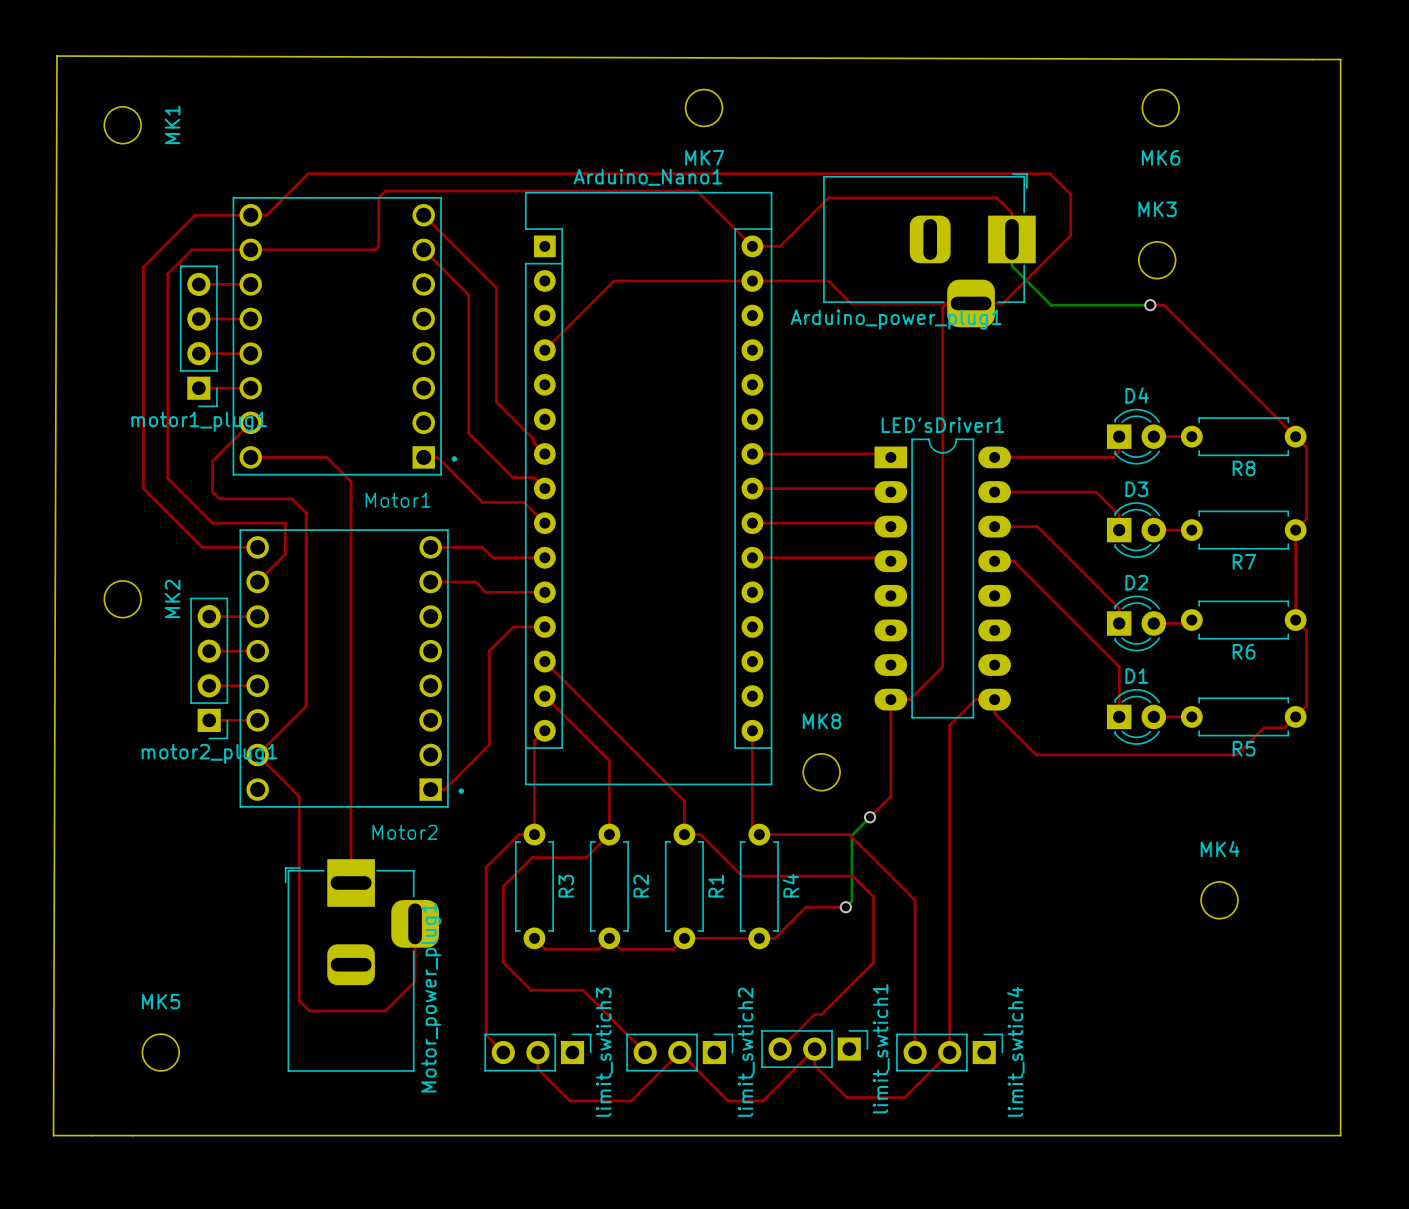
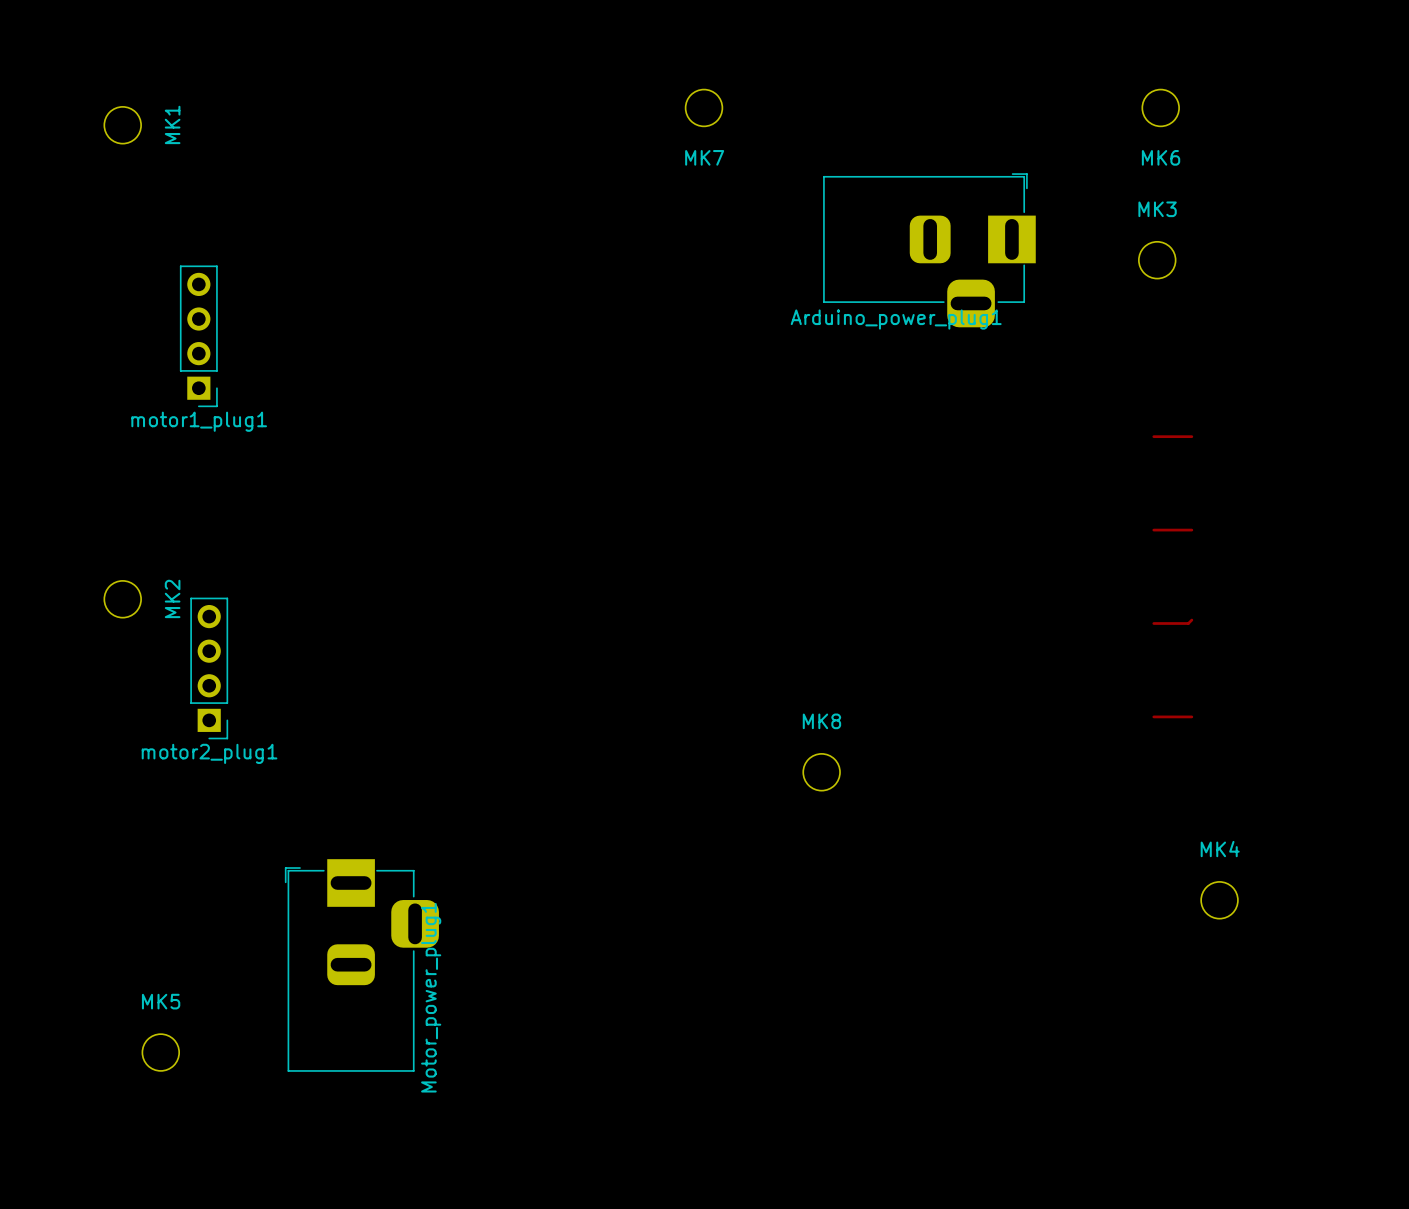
board edge: (56, 56) (53, 1135) (1340, 1135) (1340, 59) (56, 56) -> none
top track: (423, 215) (496, 287) (496, 402) (533, 439) (533, 443) (544, 453) -> none
top track: (1011, 239) (1011, 212) (996, 197) (828, 197) (780, 246) (752, 246) (697, 191) (385, 191) (378, 197) (378, 246) (375, 249) (191, 249) (167, 274) (167, 478) (212, 523) (285, 523) (285, 554) (257, 581) -> none
bottom track: (1011, 239) (1011, 266) (1051, 305) (1150, 305) -> none
top track: (423, 249) (468, 294) (468, 433) (513, 477) (533, 477) (544, 488) -> none
top track: (198, 284) (250, 284) -> none
top track: (947, 303) (942, 307) (942, 666) (909, 699) (890, 699) (890, 796) (870, 817) -> none
top track: (1150, 305) (1164, 305) (1306, 447) (1306, 519) (1295, 530) (1295, 620) (1306, 630) (1306, 706) (1284, 727) (1263, 727) (1236, 754) (1036, 754) (994, 713) (994, 699) (975, 699) (949, 725) (949, 1052) (904, 1097) (846, 1097) (814, 1065) (814, 1049) (762, 1100) (728, 1100) (679, 1052) (631, 1100) (569, 1100) (537, 1068) (537, 1052) -> none
via: (1150, 305) -> none
top track: (198, 319) (250, 319) -> none
Motor1: (344, 336) -> none
top track: (544, 350) (614, 280) (828, 280) (851, 303) (1002, 303) (1070, 235) (1070, 194) (1049, 173) (308, 173) (266, 215) (195, 215) (143, 267) (143, 488) (202, 547) (257, 547) -> none
top track: (198, 353) (250, 353) -> none
top track: (198, 388) (250, 388) -> none
top track: (250, 422) (212, 460) (212, 492) (219, 498) (292, 498) (306, 512) (306, 706) (257, 754) (299, 796) (299, 1000) (309, 1011) (385, 1011) (415, 981) (415, 923) -> none
top track: (1119, 436) (1119, 451) (1113, 457) (994, 457) -> none
D4: (1136, 436) -> none
R8: (1243, 436) -> none
top track: (752, 453) (887, 453) (890, 457) -> none
top track: (250, 457) (326, 457) (351, 481) (351, 882) -> none
top track: (423, 457) (437, 457) (482, 502) (524, 502) (544, 523) -> none
Arduino_Nano1: (648, 488) -> none
top track: (752, 488) (887, 488) (890, 492) -> none
top track: (994, 492) (1096, 492) (1119, 515) (1119, 530) -> none
top track: (752, 523) (887, 523) (890, 526) -> none
top track: (994, 526) (1037, 526) (1119, 608) (1119, 623) -> none
D3: (1136, 530) -> none
R7: (1243, 530) -> none
top track: (430, 547) (482, 547) (492, 557) (544, 557) -> none
top track: (752, 557) (887, 557) (890, 561) -> none
top track: (994, 561) (1013, 561) (1119, 666) (1119, 716) -> none
LED'sDriver1: (942, 578) -> none
top track: (430, 581) (475, 581) (486, 592) (544, 592) -> none
top track: (209, 616) (257, 616) -> none
R6: (1243, 620) -> none
D2: (1136, 623) -> none
top track: (544, 626) (513, 626) (489, 651) (489, 744) (444, 789) (430, 789) -> none
top track: (209, 651) (257, 651) -> none
top track: (544, 661) (684, 801) (684, 834) (700, 834) (742, 876) (852, 876) (873, 896) (873, 962) (821, 1014) (814, 1014) (780, 1049) -> none
Motor2: (351, 668) -> none
top track: (209, 685) (257, 685) -> none
top track: (544, 696) (609, 760) (609, 834) (586, 857) (532, 857) (503, 886) (503, 962) (530, 990) (582, 990) (652, 1059) -> none
D1: (1136, 716) -> none
R5: (1243, 716) -> none
top track: (209, 720) (257, 720) -> none
top track: (544, 730) (534, 741) (534, 834) (519, 834) (486, 867) (486, 1035) (503, 1052) -> none
top track: (752, 730) (752, 827) (759, 834) (849, 834) (915, 900) (915, 1052) -> none
bottom track: (870, 817) (851, 835) (851, 901) (845, 907) -> none
via: (870, 817) -> none
R3: (534, 886) -> none
R2: (609, 886) -> none
R1: (684, 886) -> none
R4: (759, 886) -> none
top track: (845, 907) (805, 907) (774, 938) (684, 938) (673, 949) (620, 949) (609, 938) (598, 949) (545, 949) (534, 938) -> none
via: (845, 907) -> none
limit_swtich1: (814, 1049) -> none
limit_swtich3: (537, 1052) -> none
limit_swtich2: (679, 1052) -> none
limit_swtich4: (949, 1052) -> none

